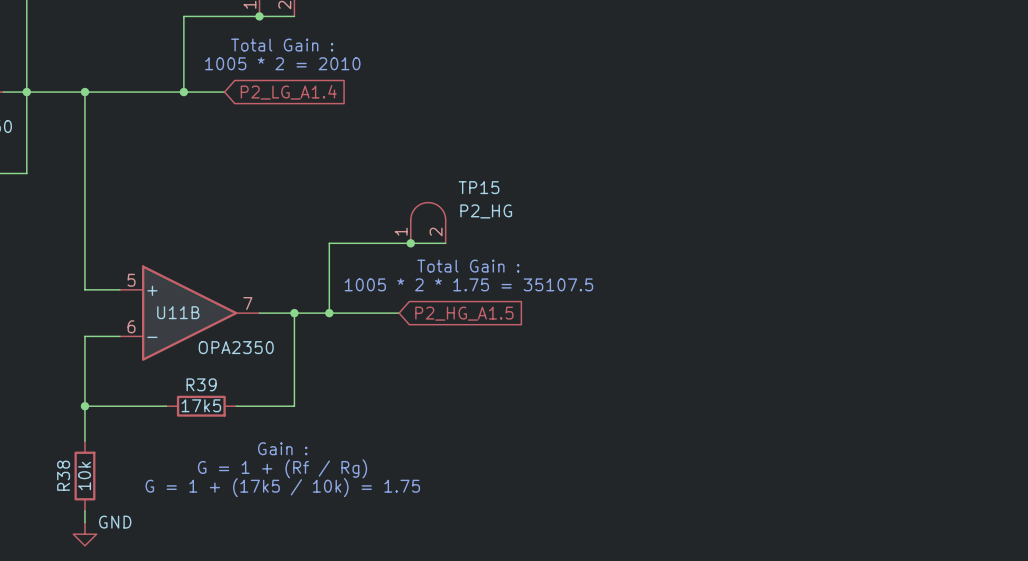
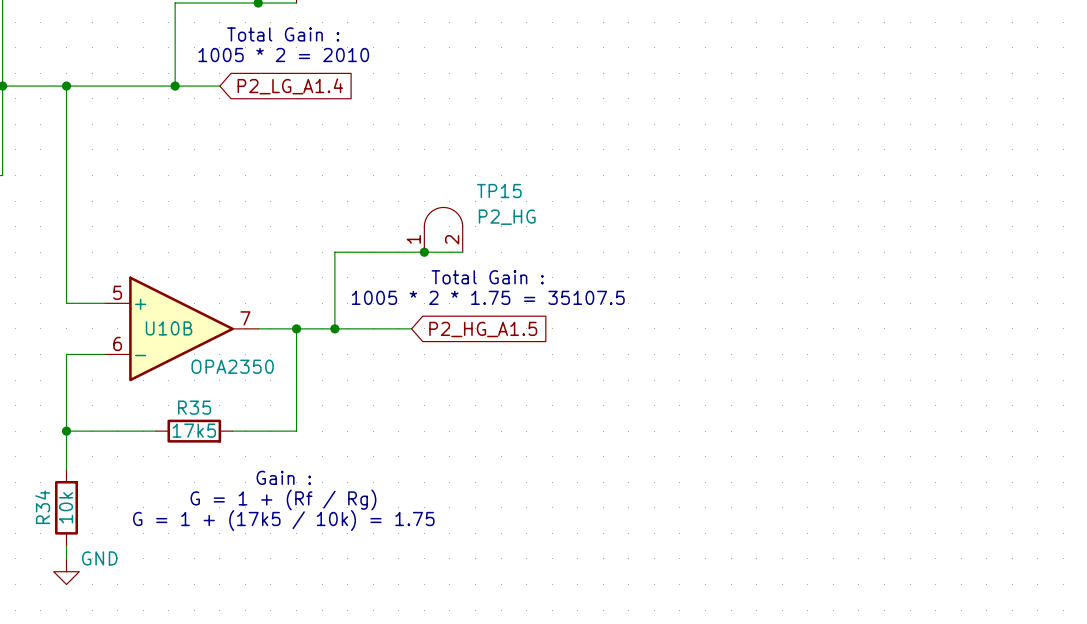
U11B name: U11B (178, 312) -> U10B (169, 328)
R39 name: R39 (201, 384) -> R35 (194, 407)
R38 name: R38 (63, 475) -> R34 (42, 507)

